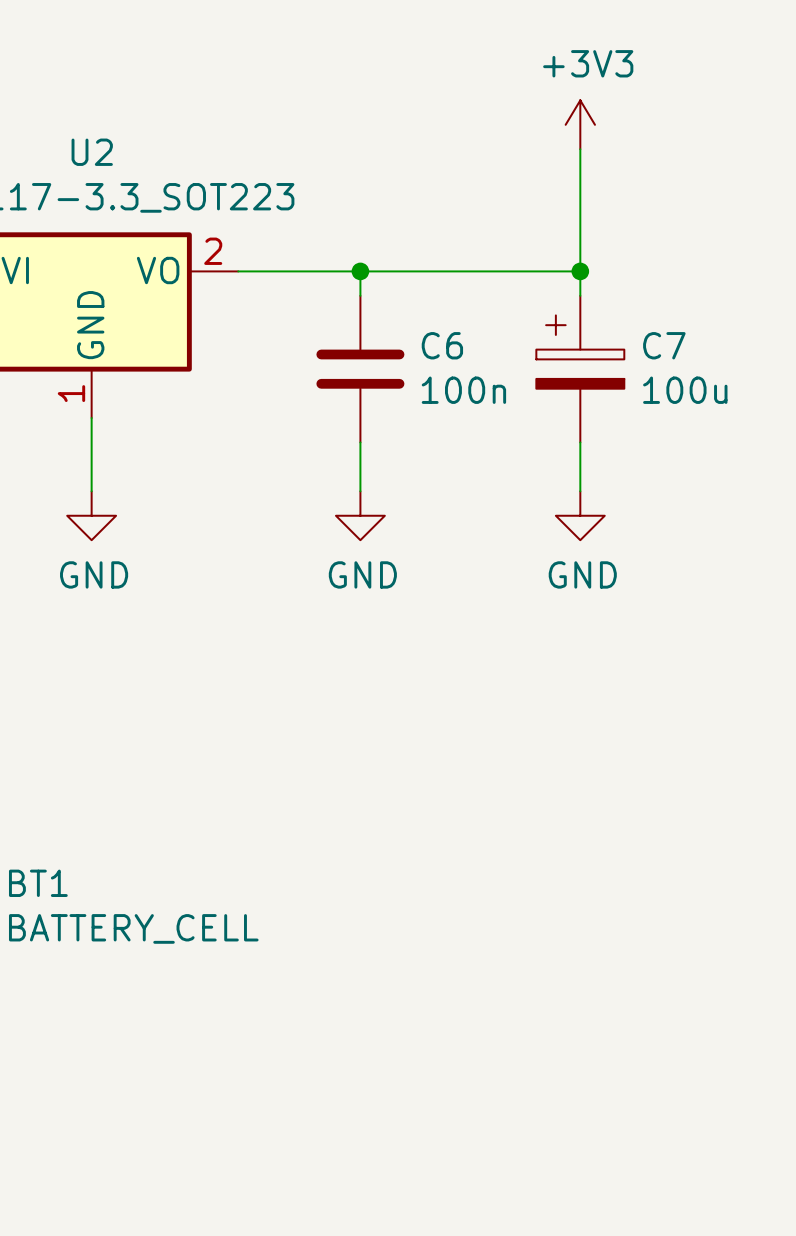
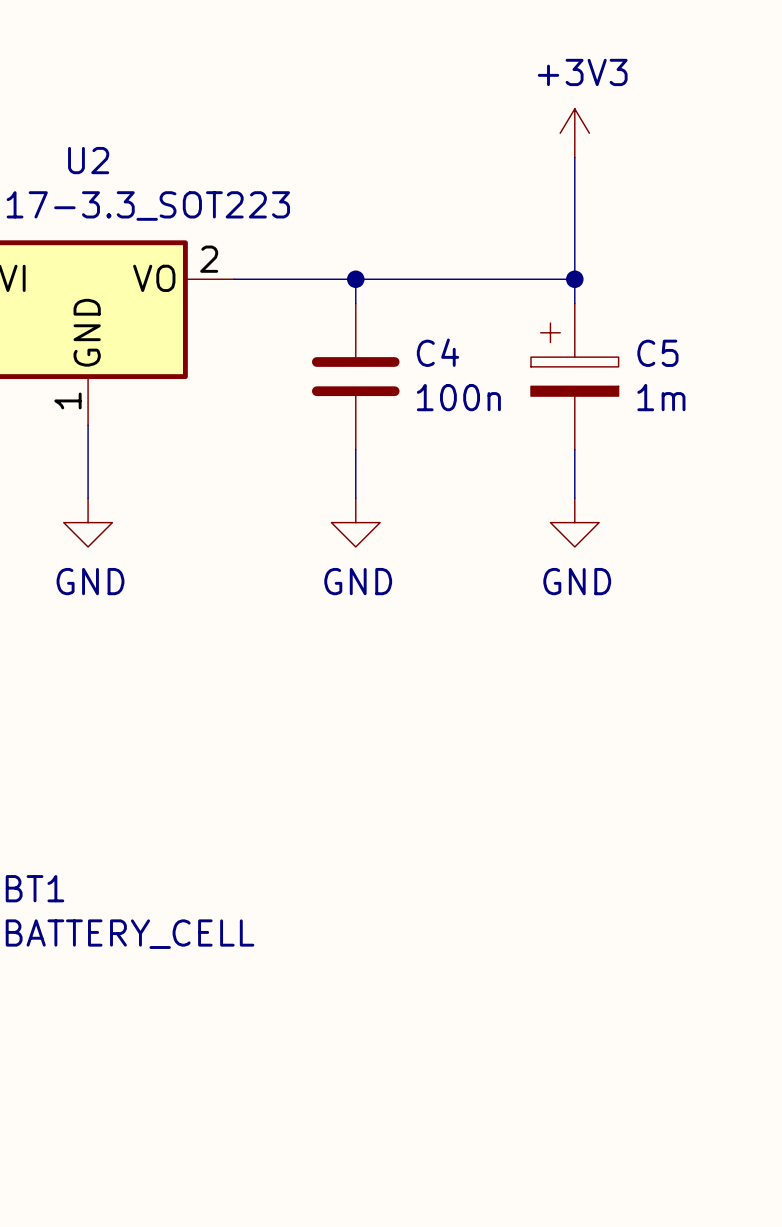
C6 name: C6 (442, 345) -> C4 (438, 352)
C7 name: C7 (664, 345) -> C5 (657, 353)
C7 value: 100u (685, 390) -> 1m (661, 397)

